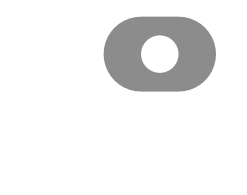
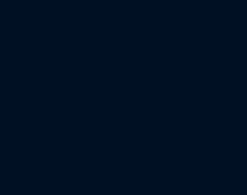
part: (159, 54) -> none

